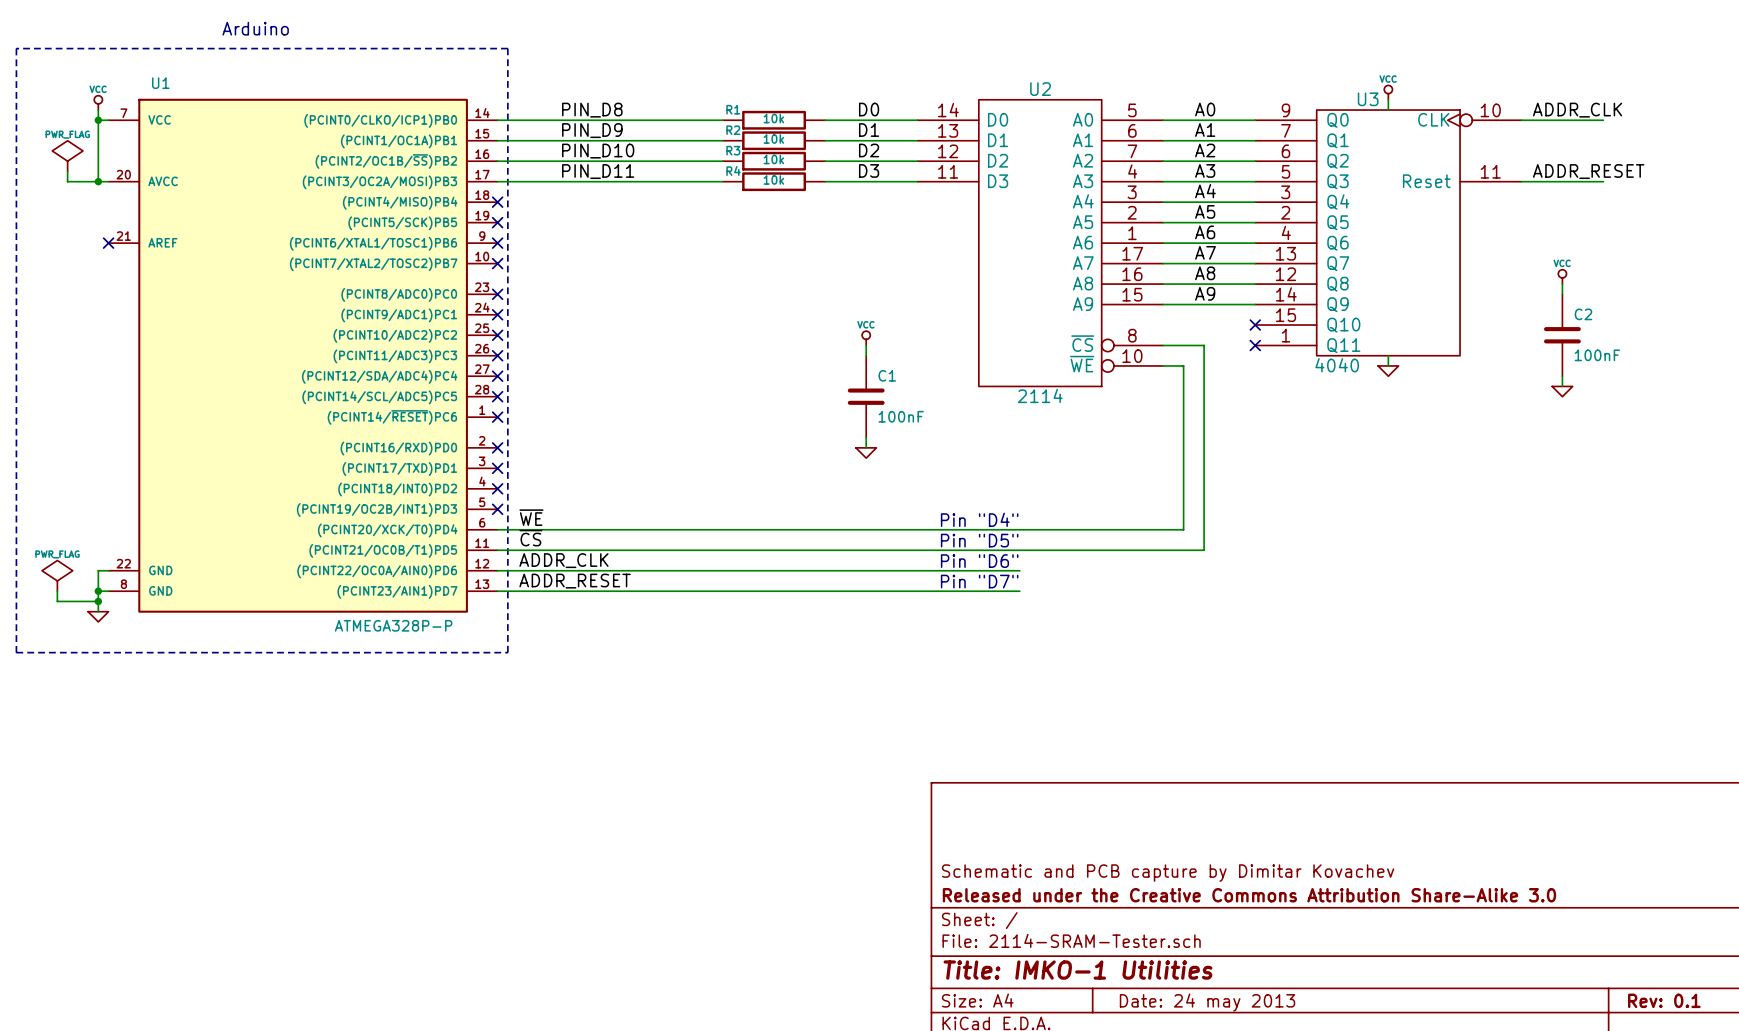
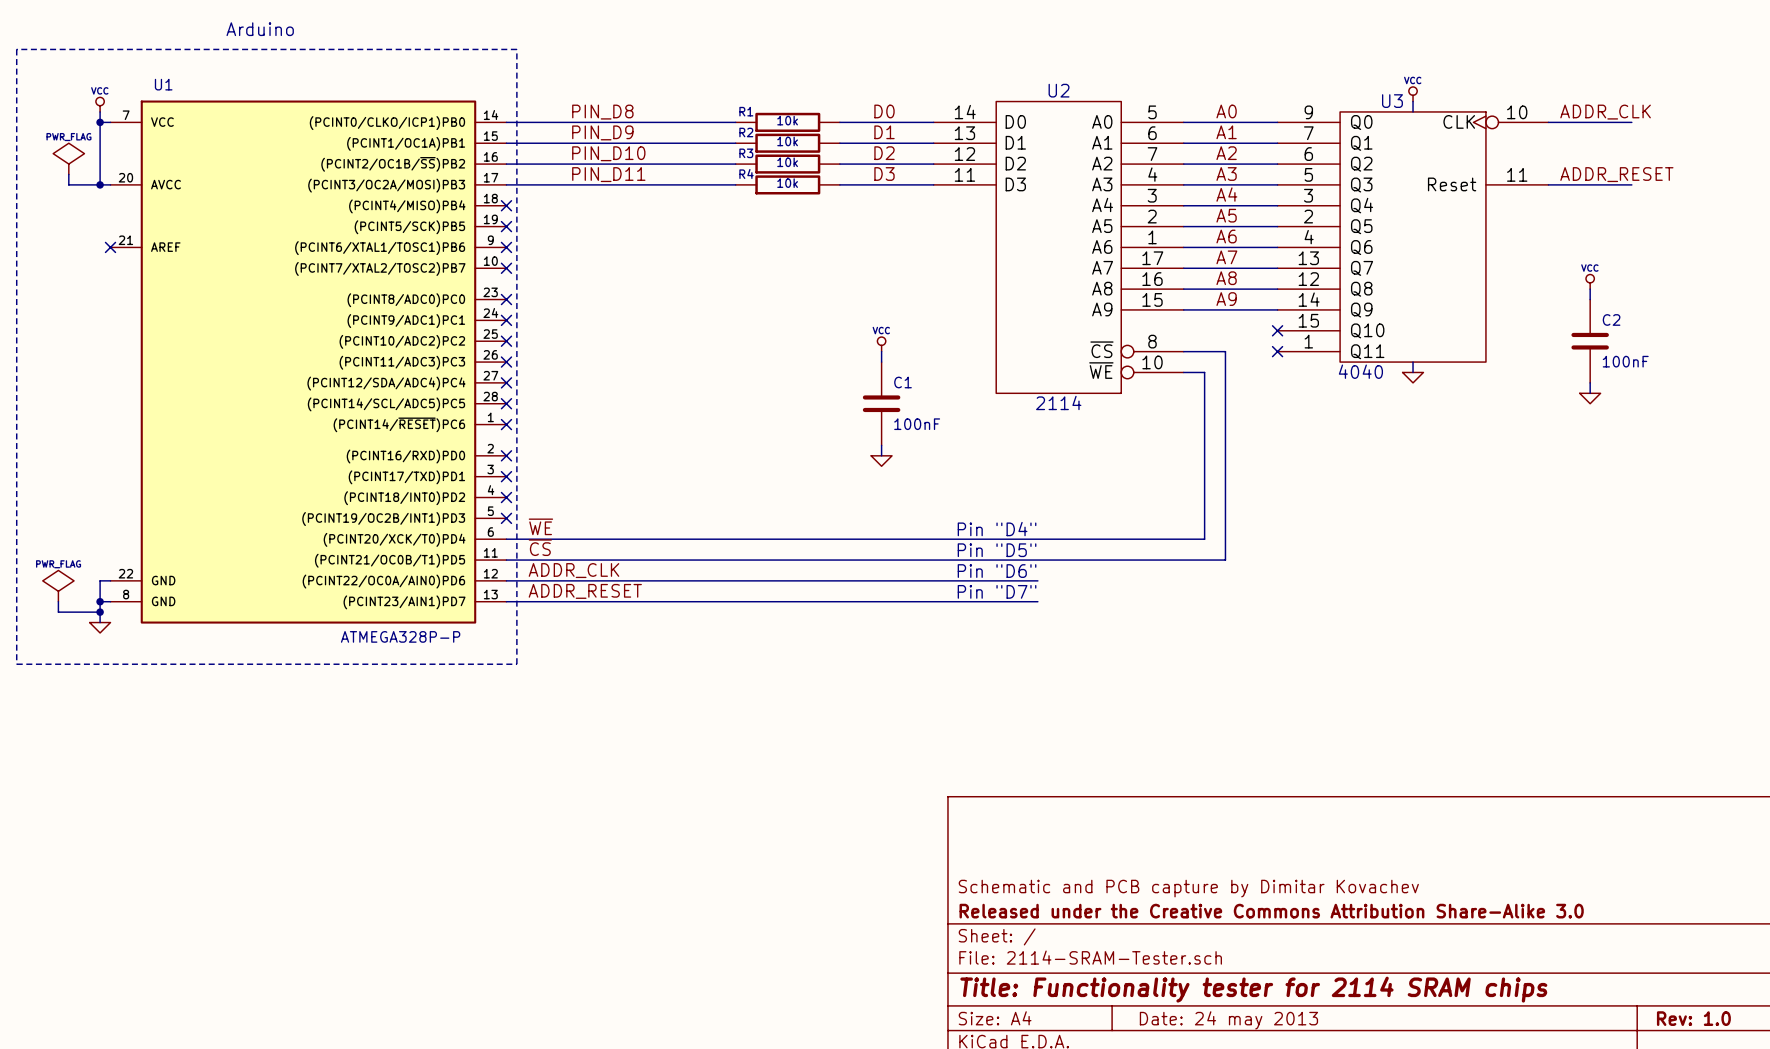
title block: Title: IMKO-1 Utilities (1078, 970) -> Title: Functionality tester for 2114 SRAM chips (1253, 989)
title block: Rev: 0.1 (1664, 1000) -> Rev: 1.0 (1693, 1018)

